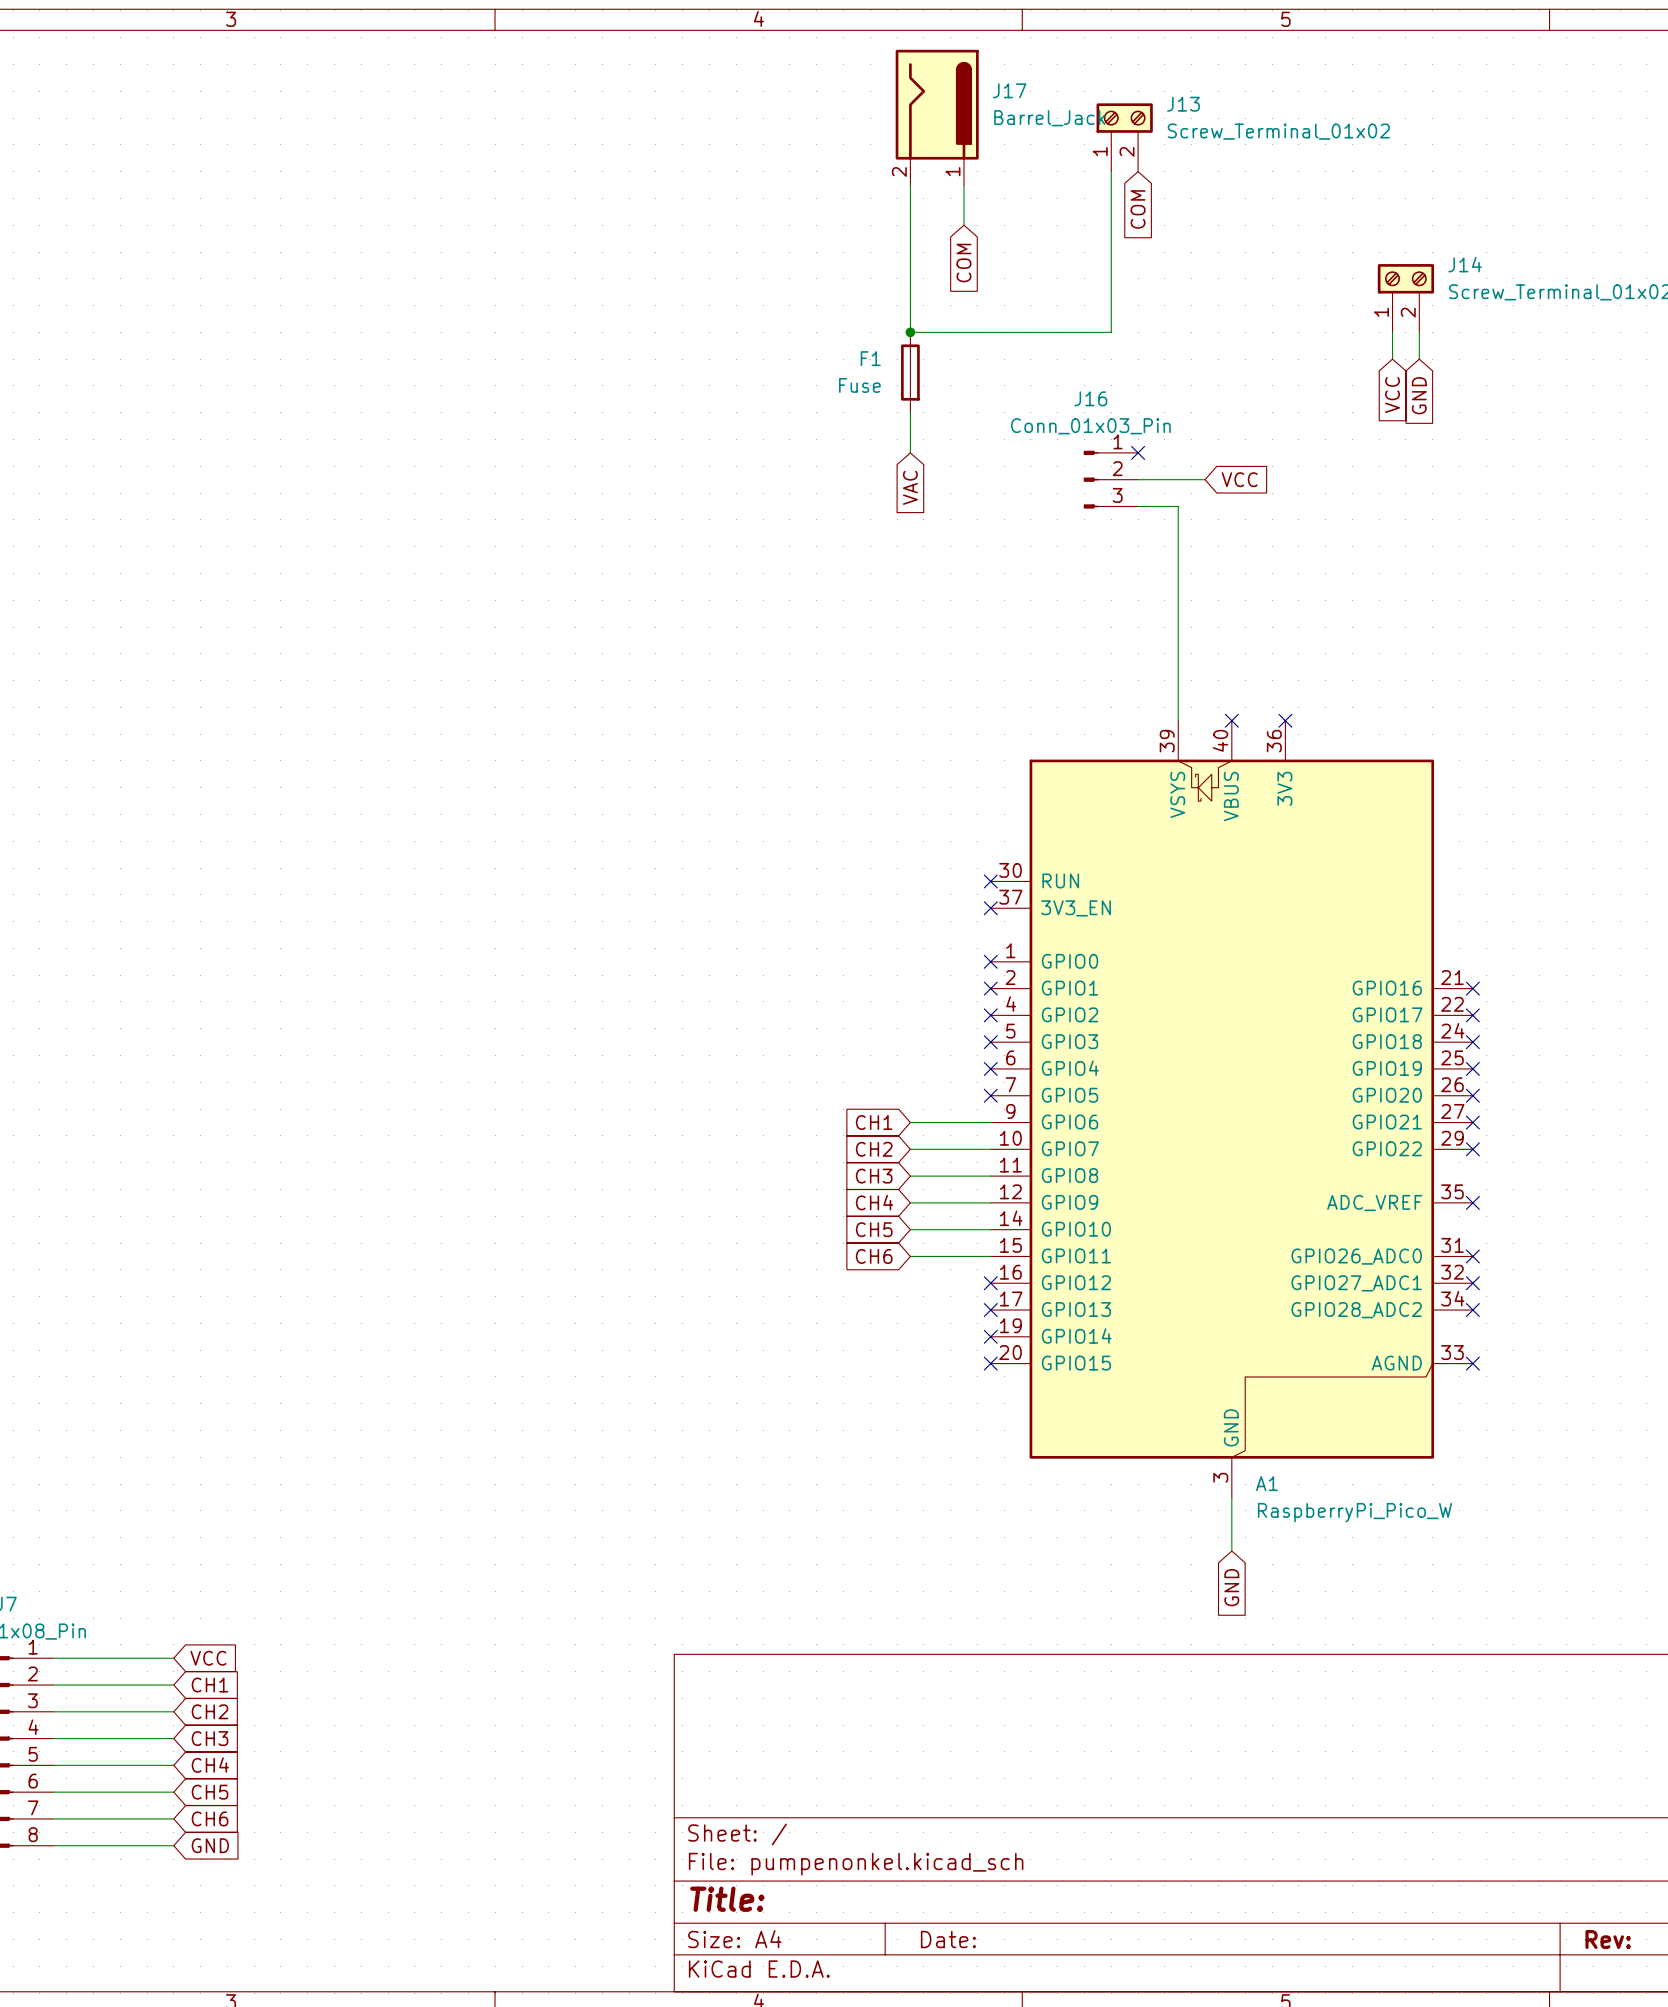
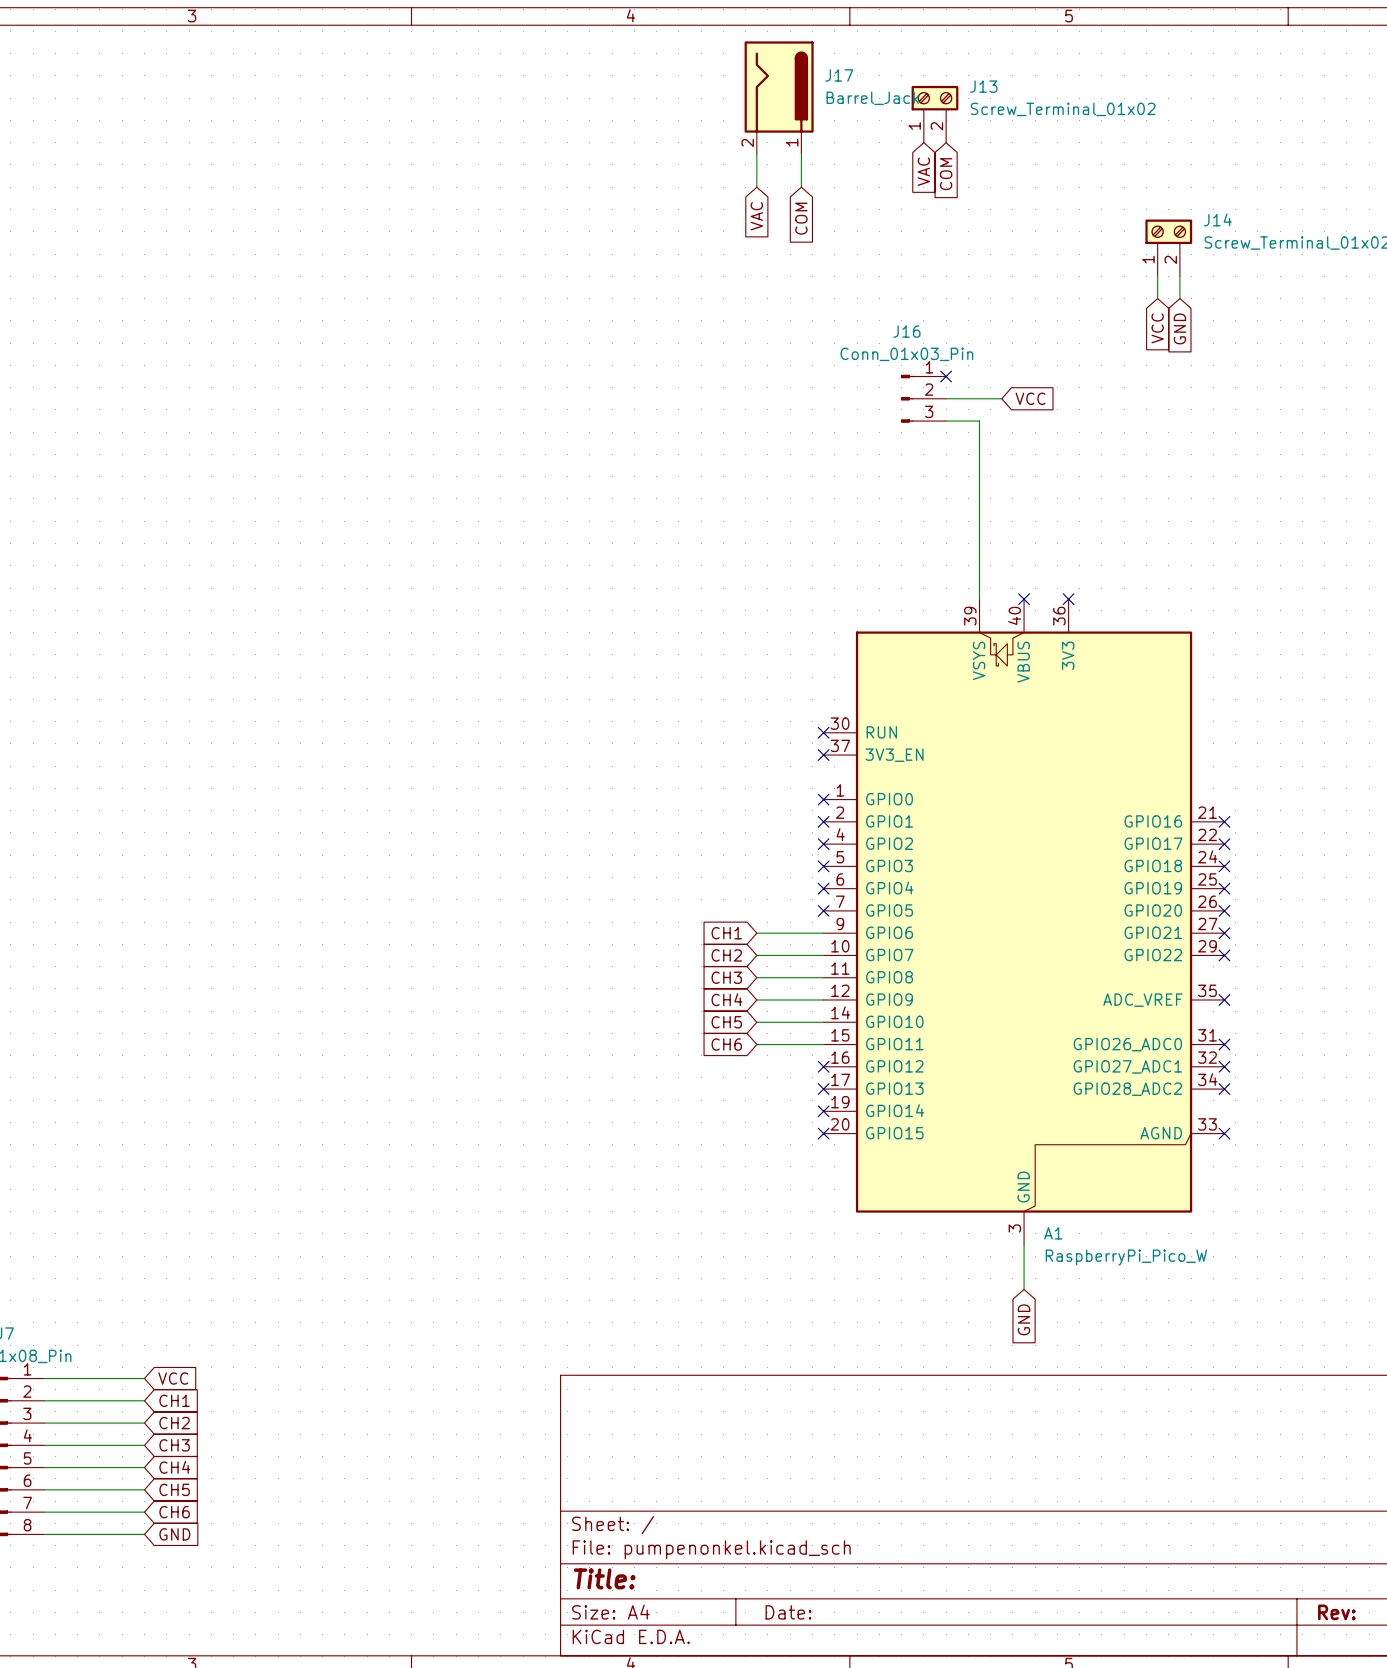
wire: (1111, 171) (1111, 332) (910, 332) (910, 225) -> none
global label: none -> VAC (923, 171)
global label: none -> VAC (756, 216)
junction: (910, 332) -> none
F1: Fuse (910, 372) -> none
wire: (910, 412) (910, 452) -> none
global label: VAC (910, 487) -> none

